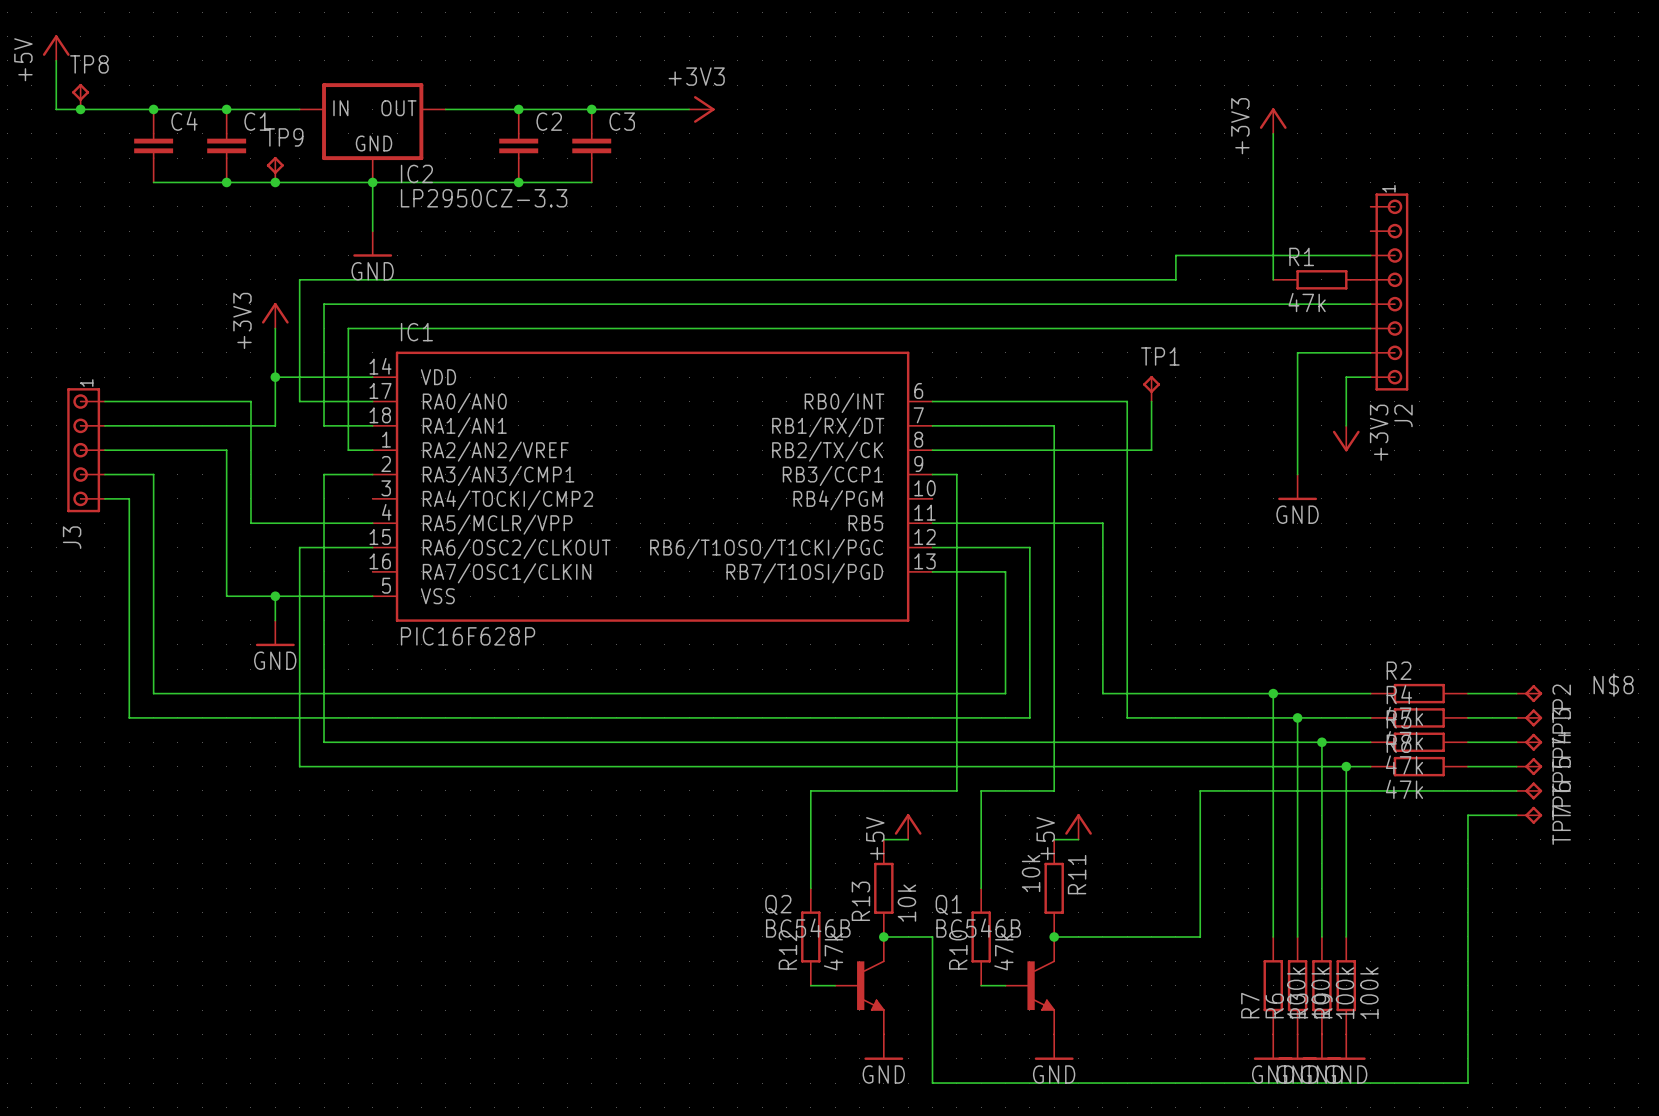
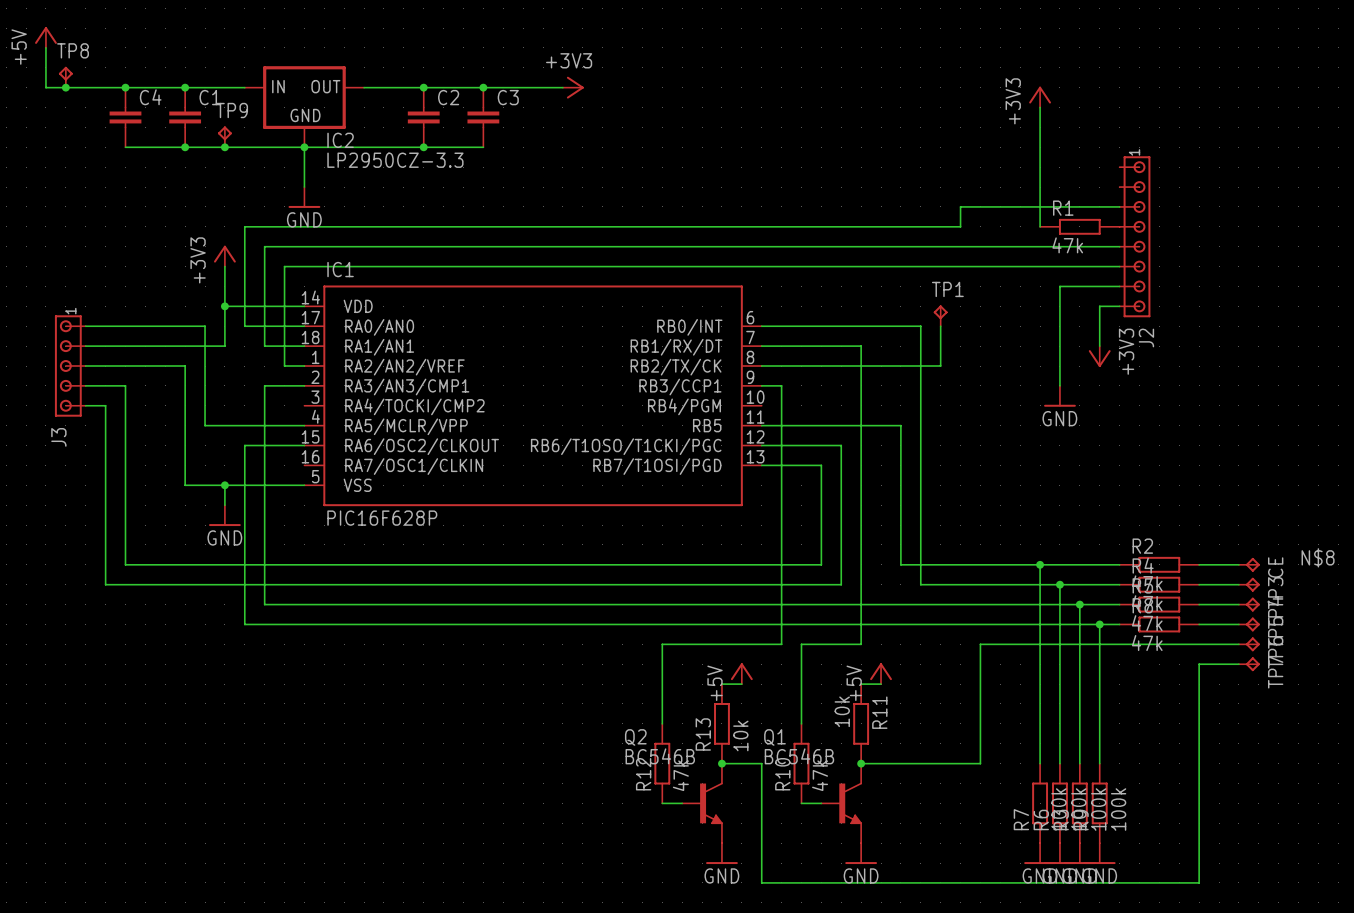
TP2 name: TP2 (1561, 703) -> CE (1275, 567)

